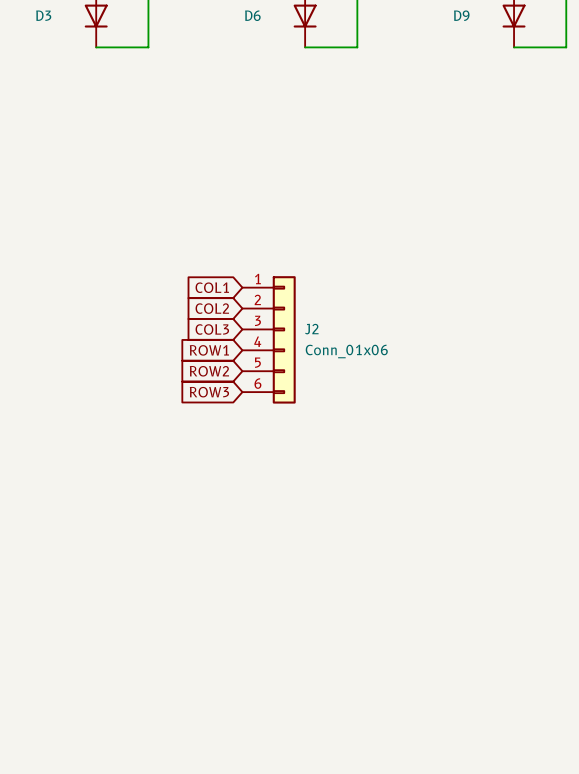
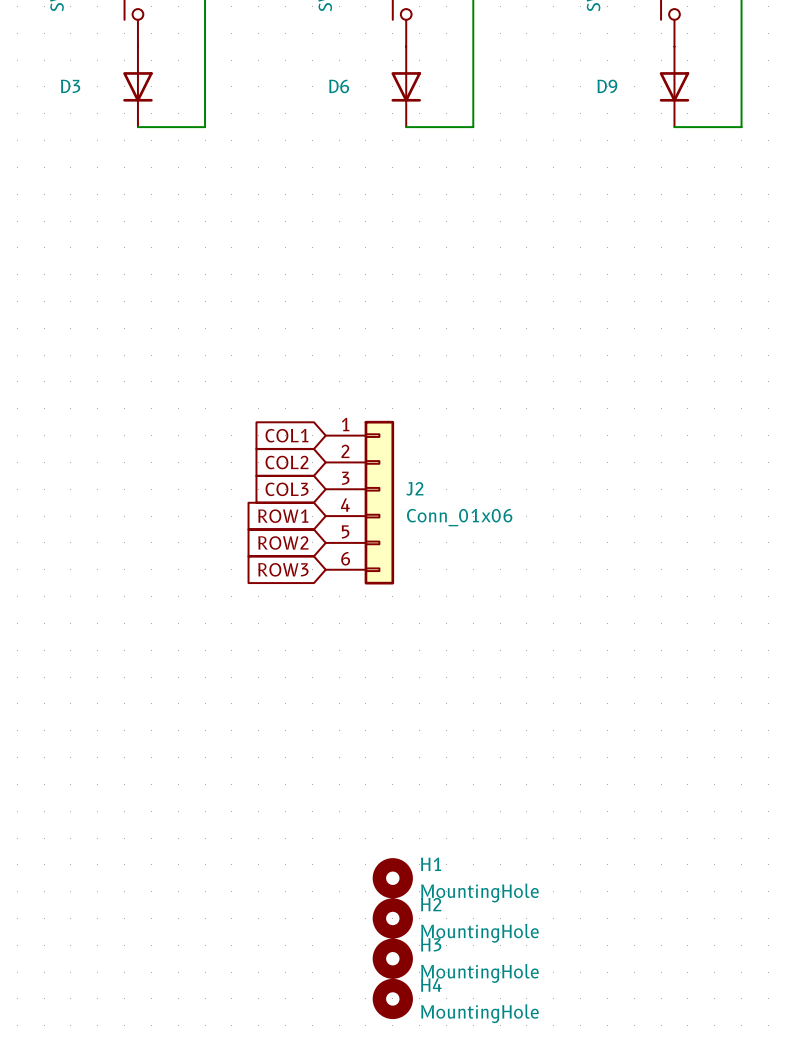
H1: none -> MountingHole (392, 878)
H2: none -> MountingHole (392, 918)
H3: none -> MountingHole (392, 958)
H4: none -> MountingHole (392, 998)

